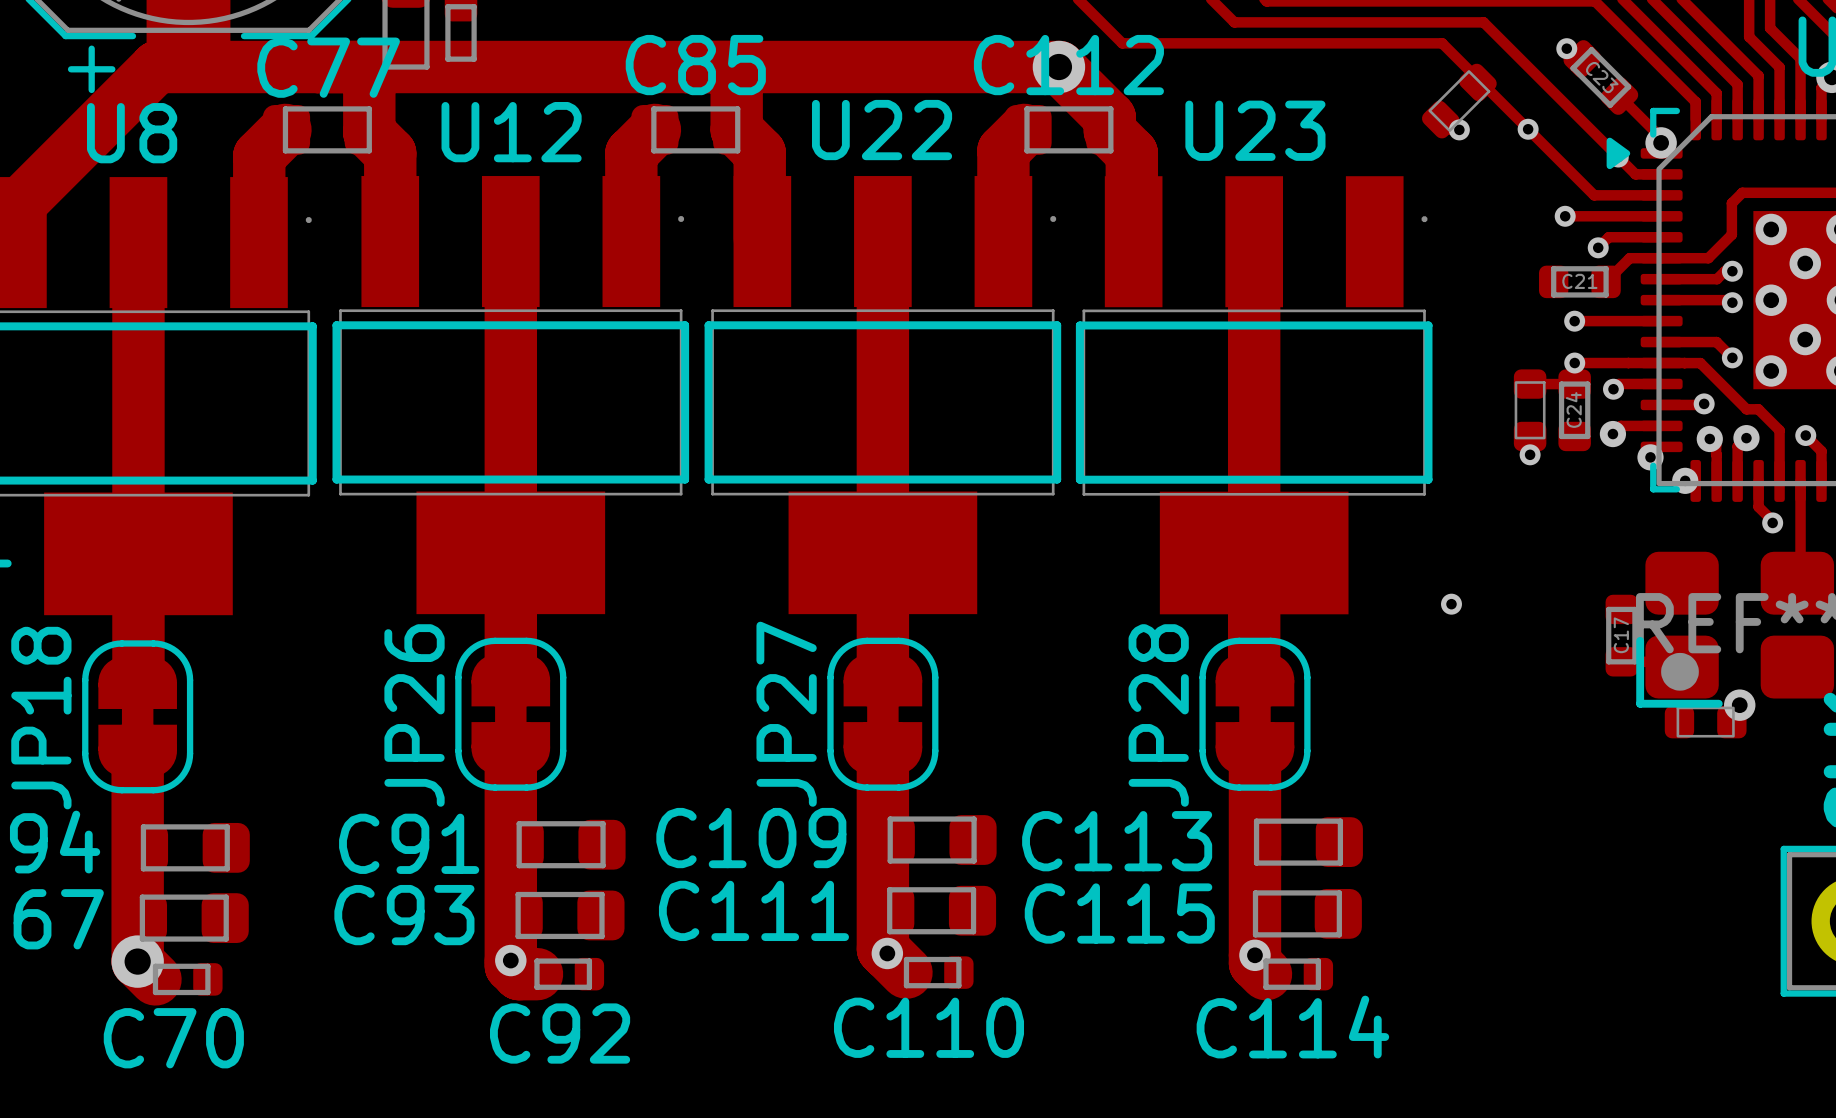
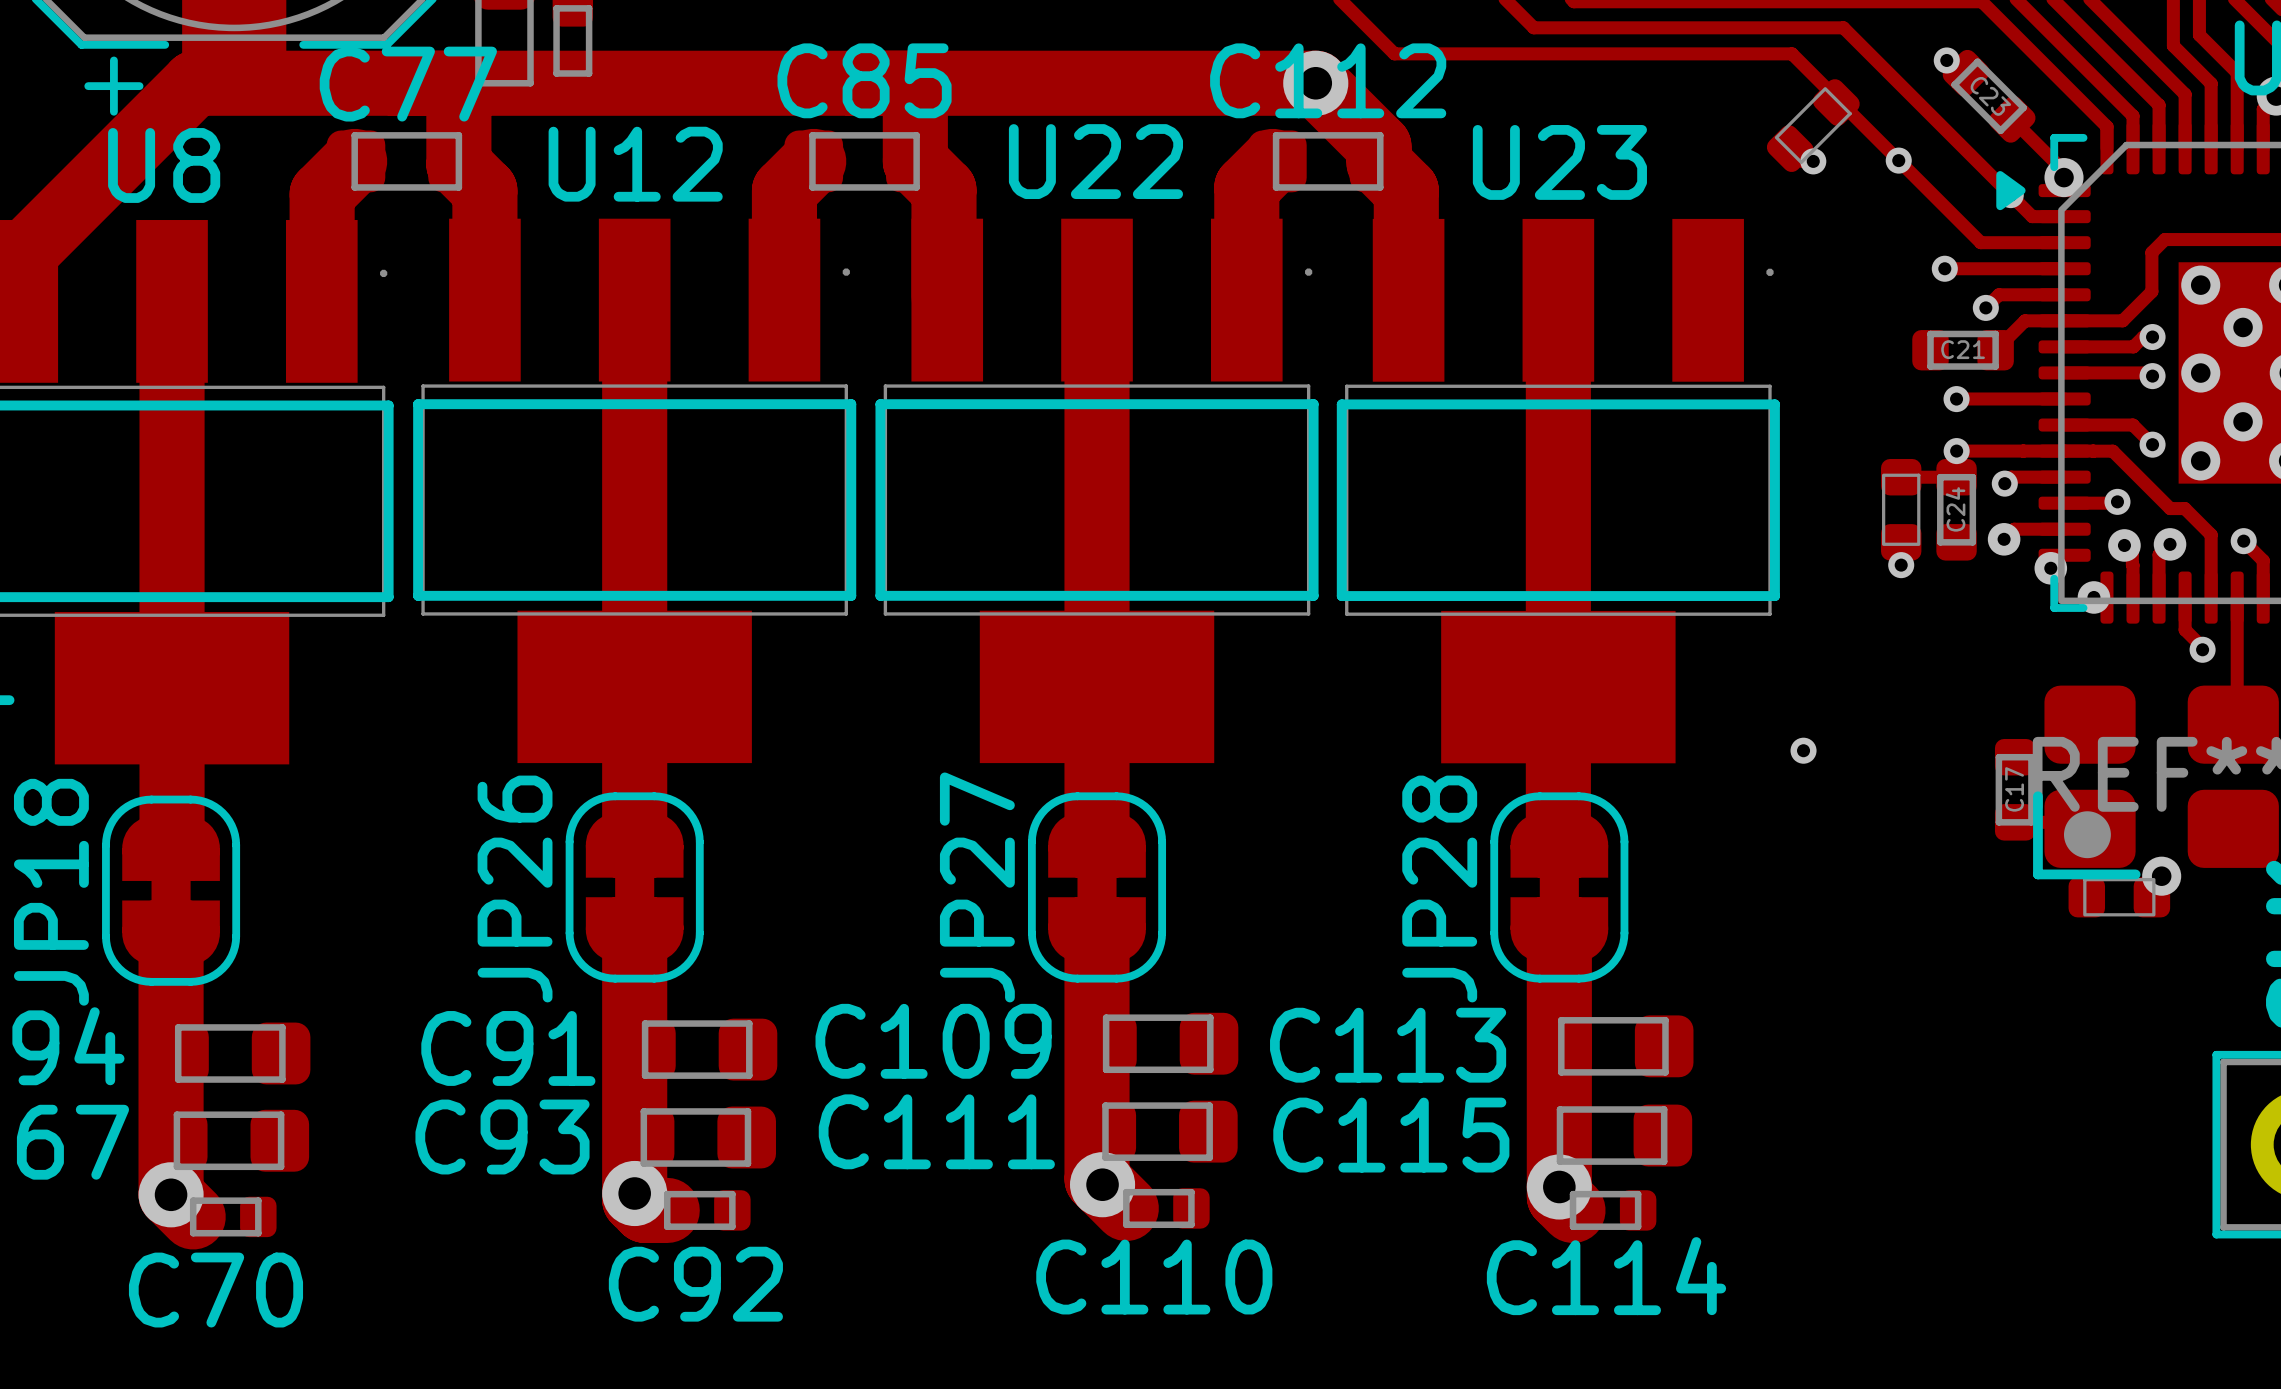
via size: [871, 937, 904, 970] -> [1069, 1152, 1136, 1218]
via size: [1239, 939, 1271, 972] -> [1526, 1154, 1592, 1220]
via size: [495, 944, 527, 977] -> [602, 1160, 668, 1227]

